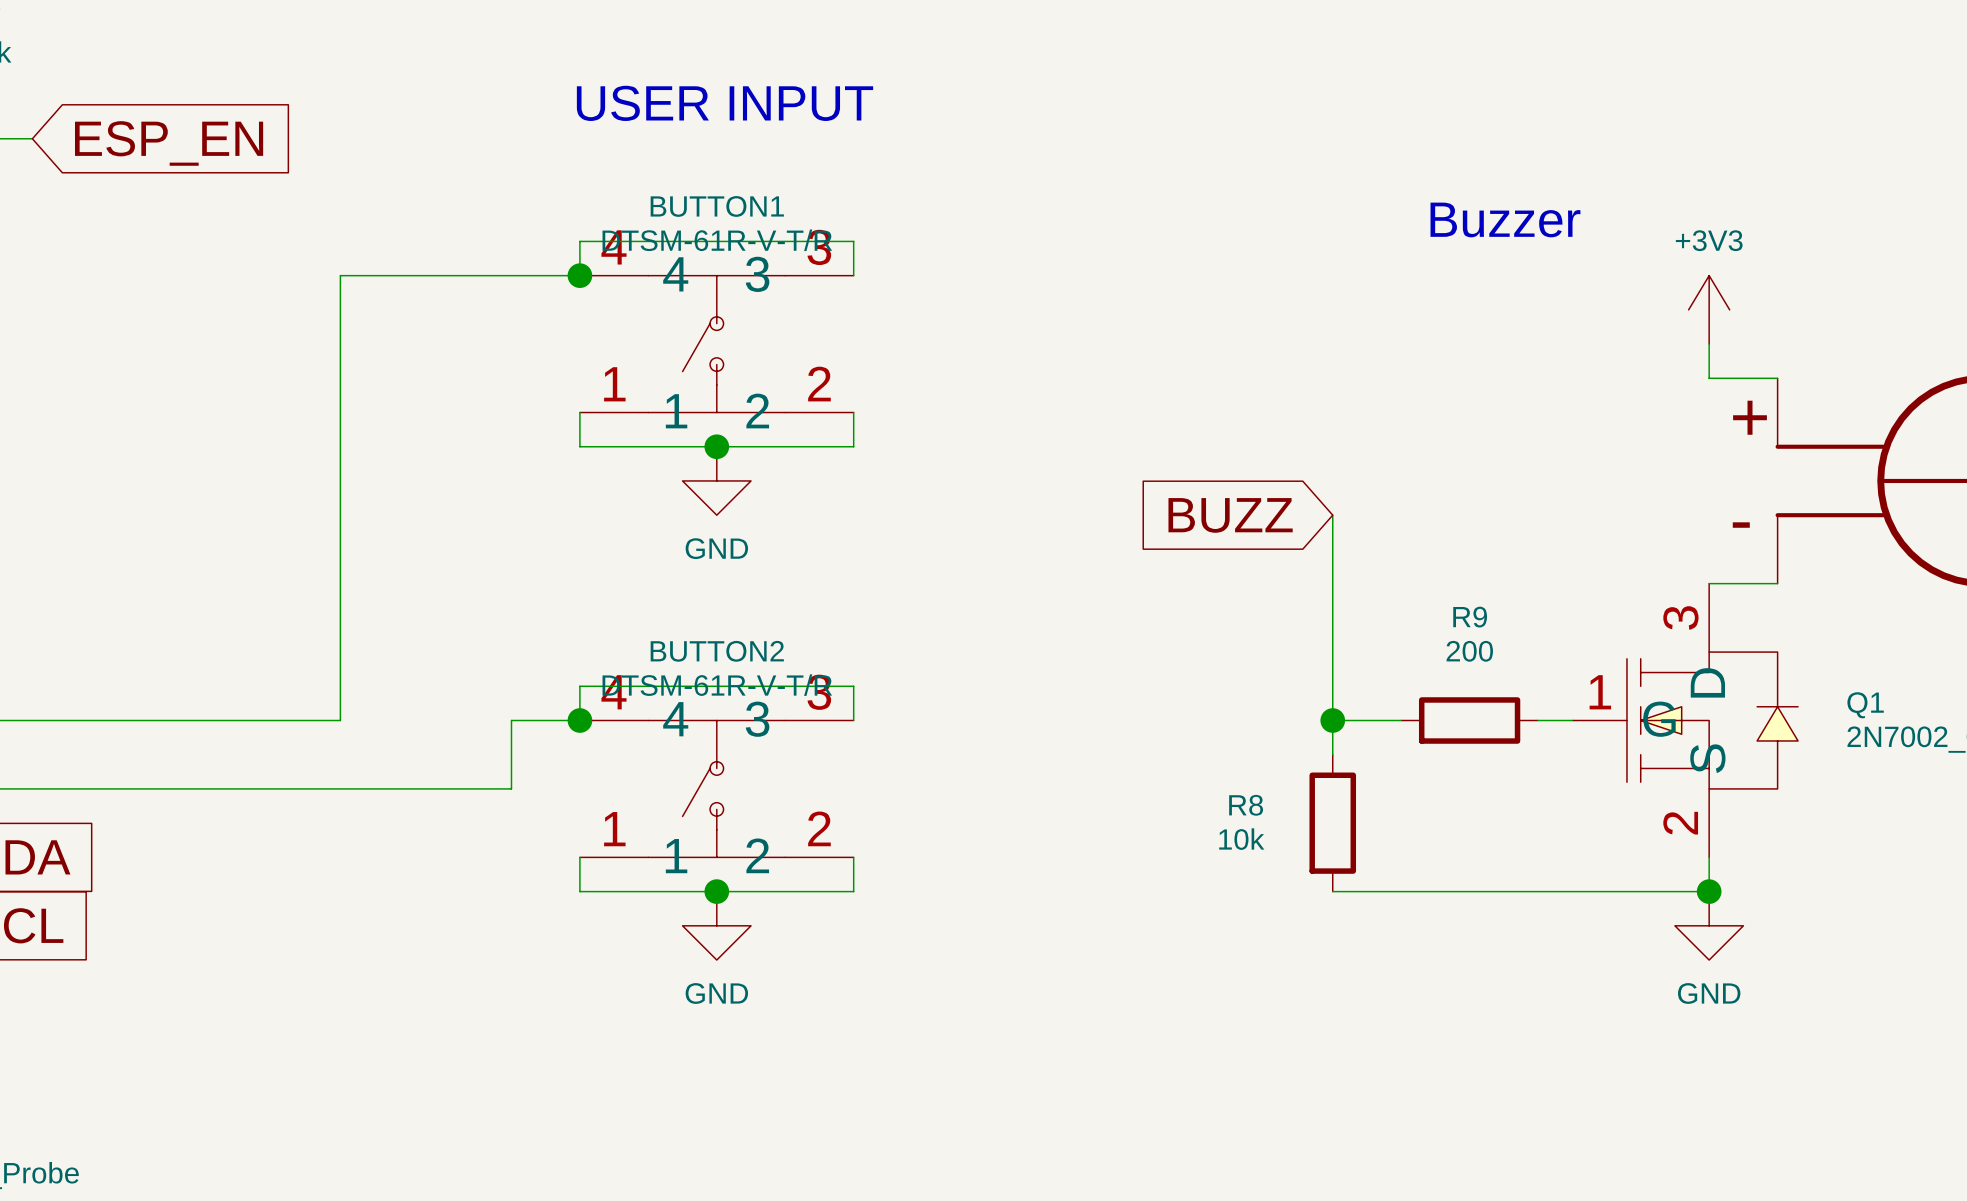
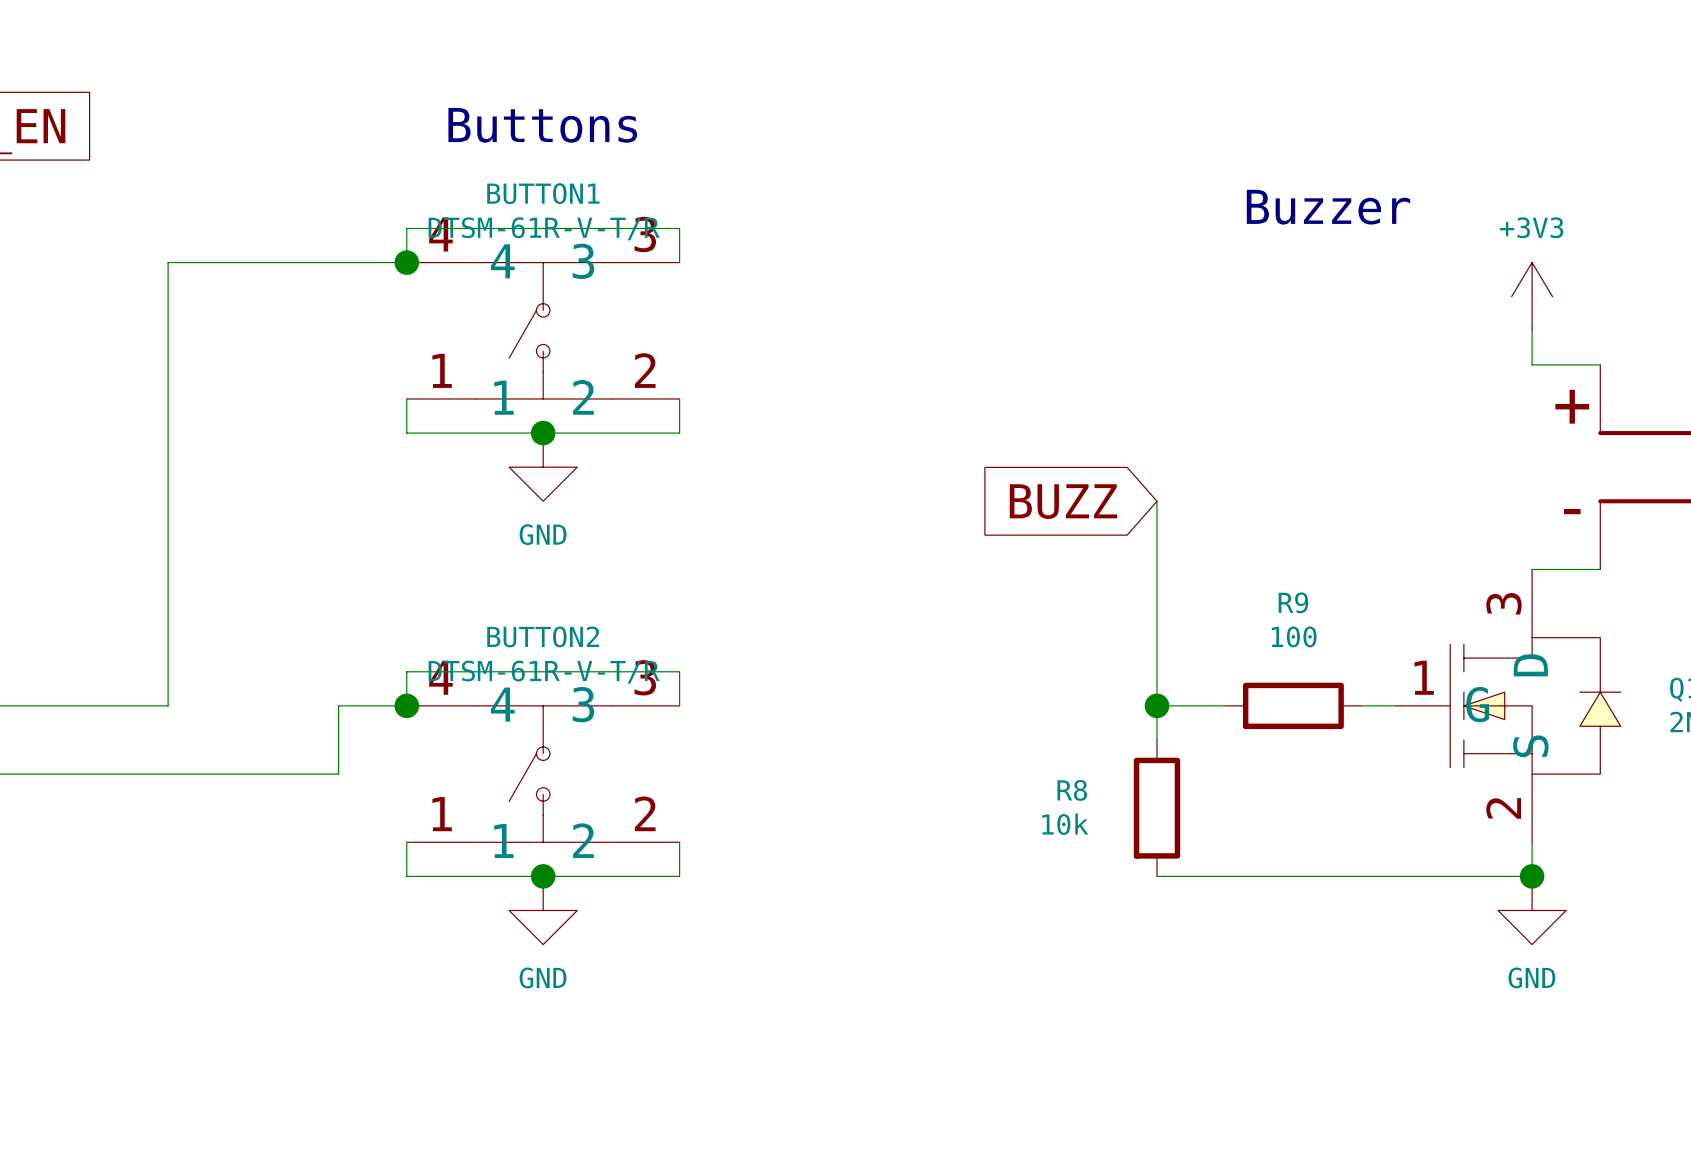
text: USER INPUT (724, 103) -> none
text: none -> Buttons (542, 125)
R9 value: 200 (1469, 651) -> 100 (1294, 636)

